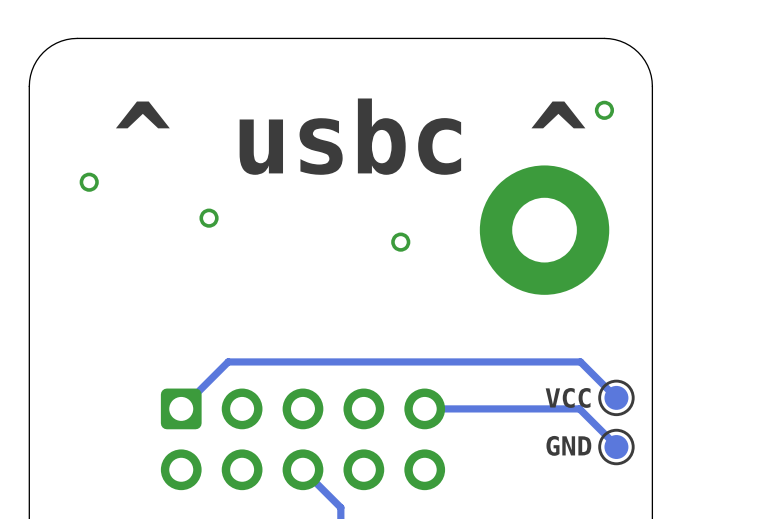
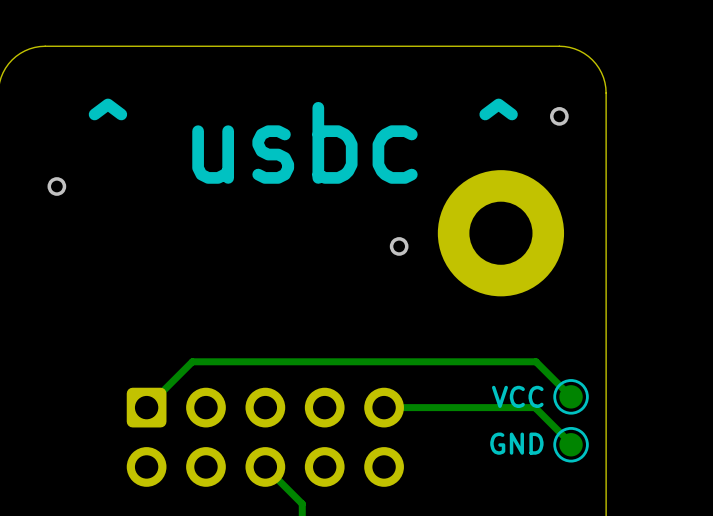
via: (209, 218) -> none
via position: (400, 242) -> (399, 246)

